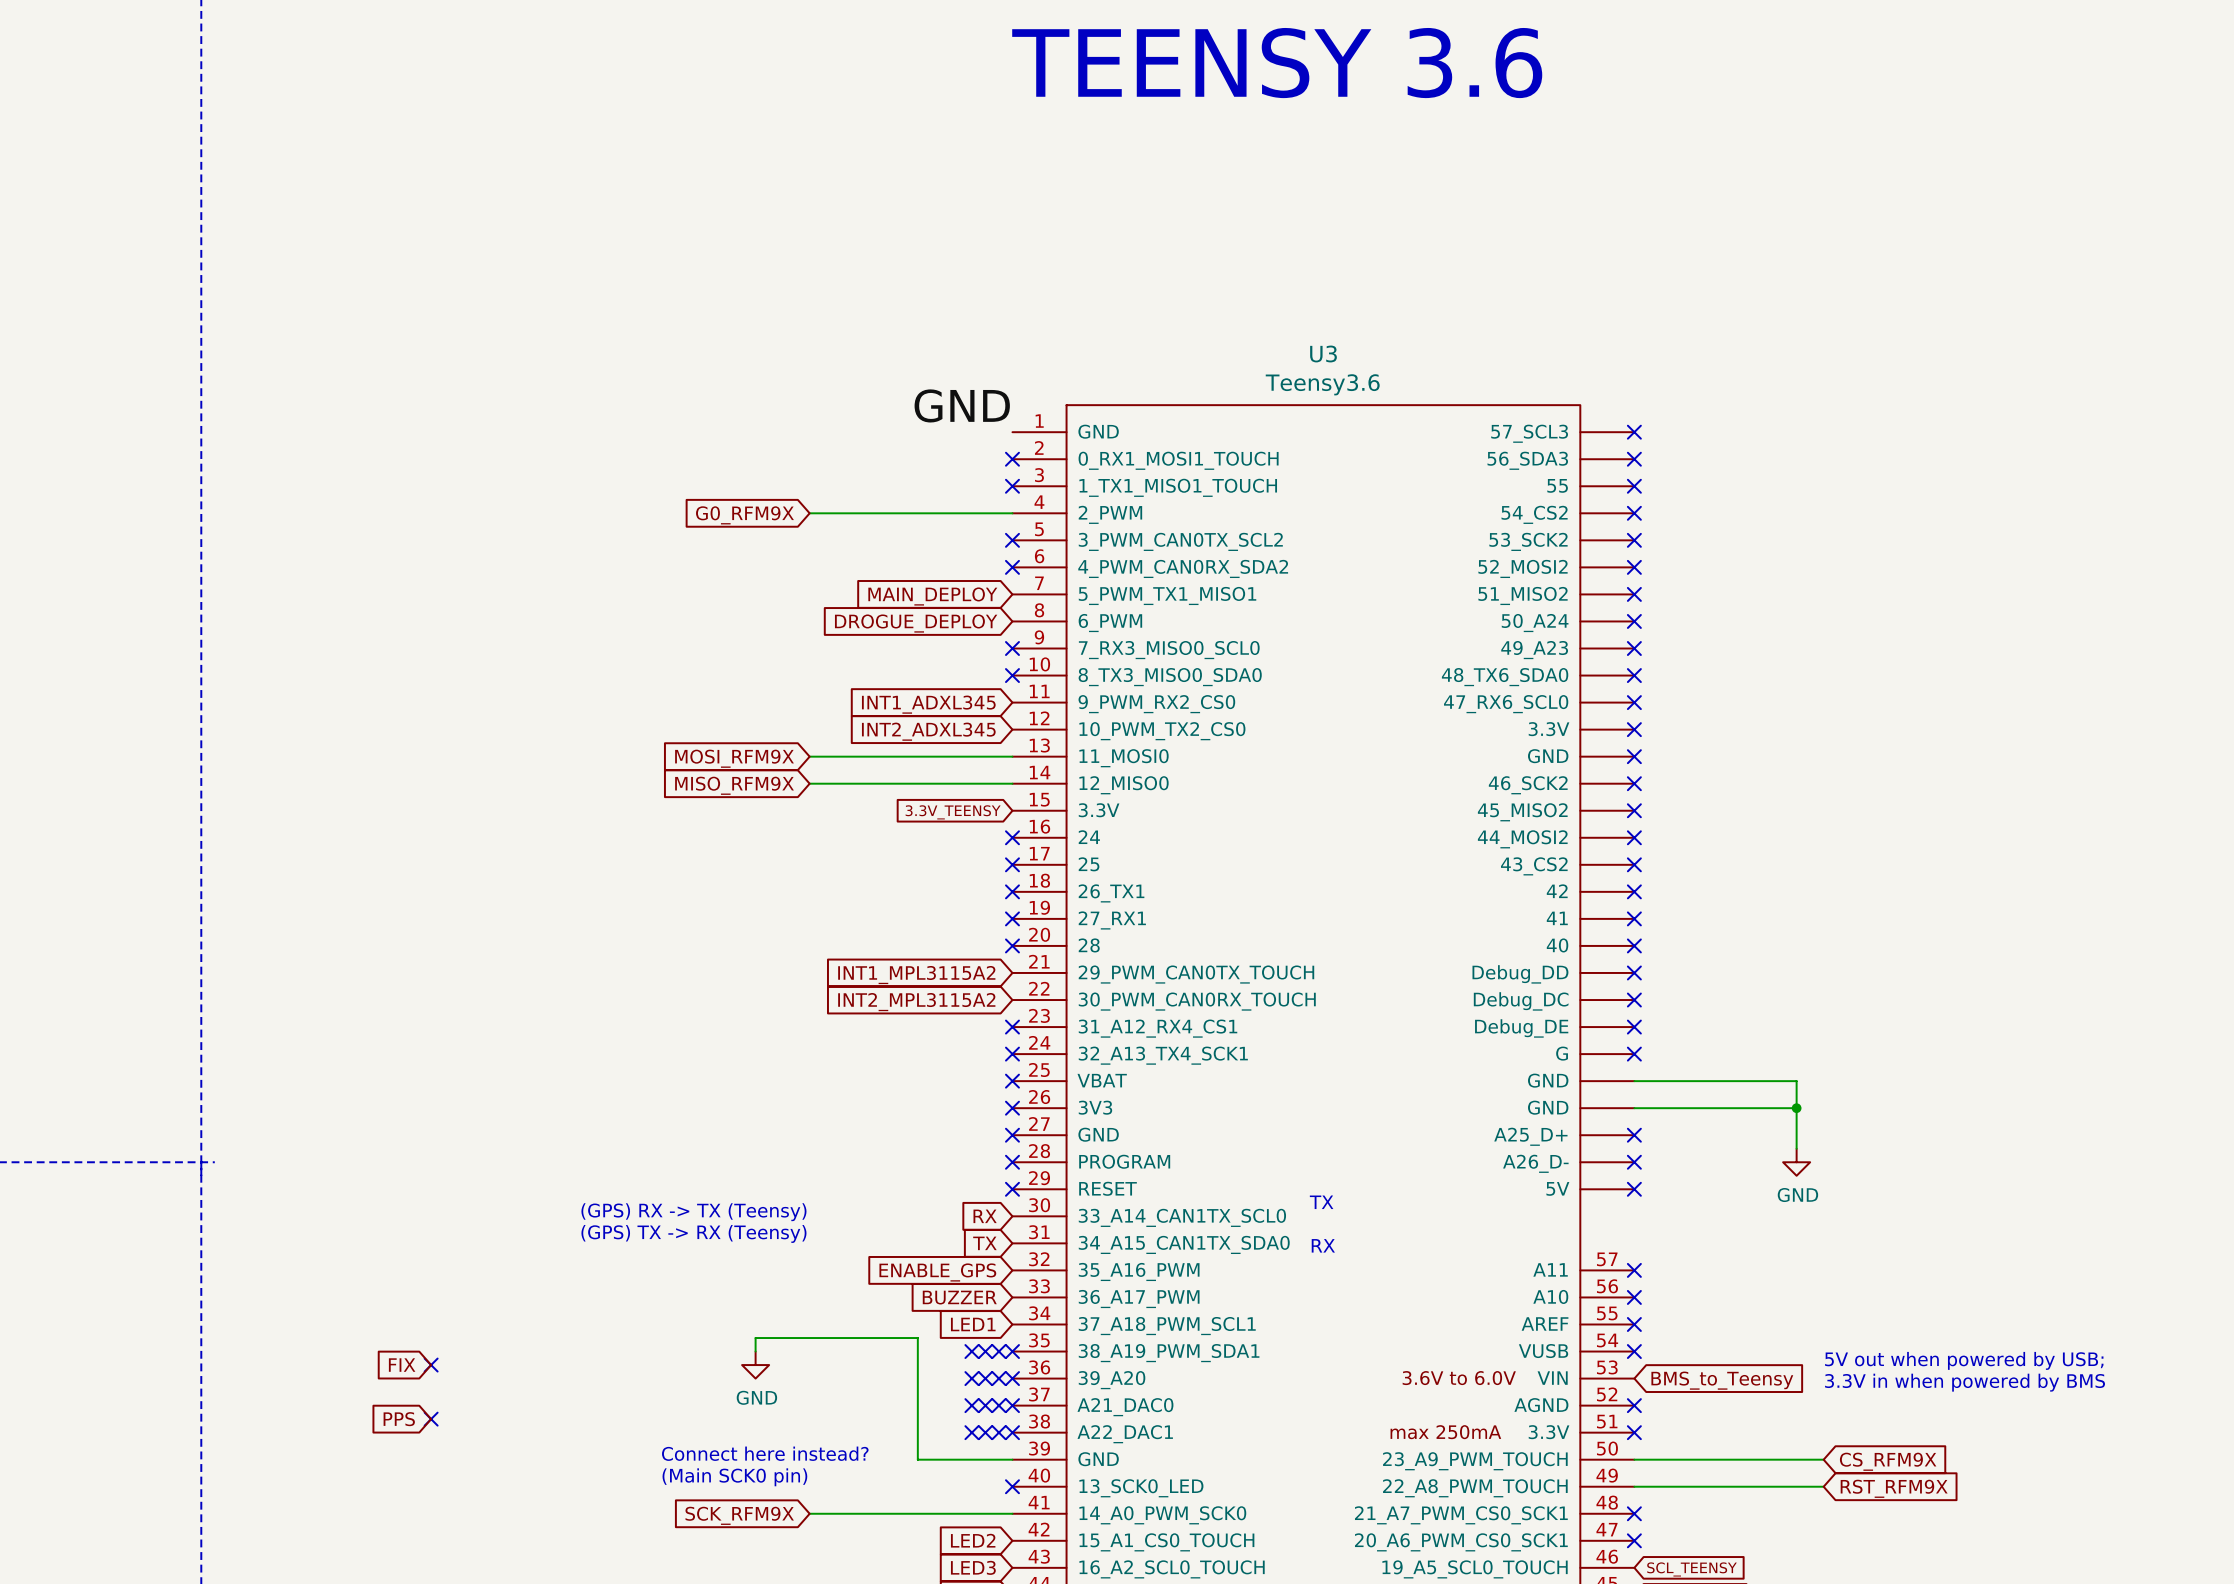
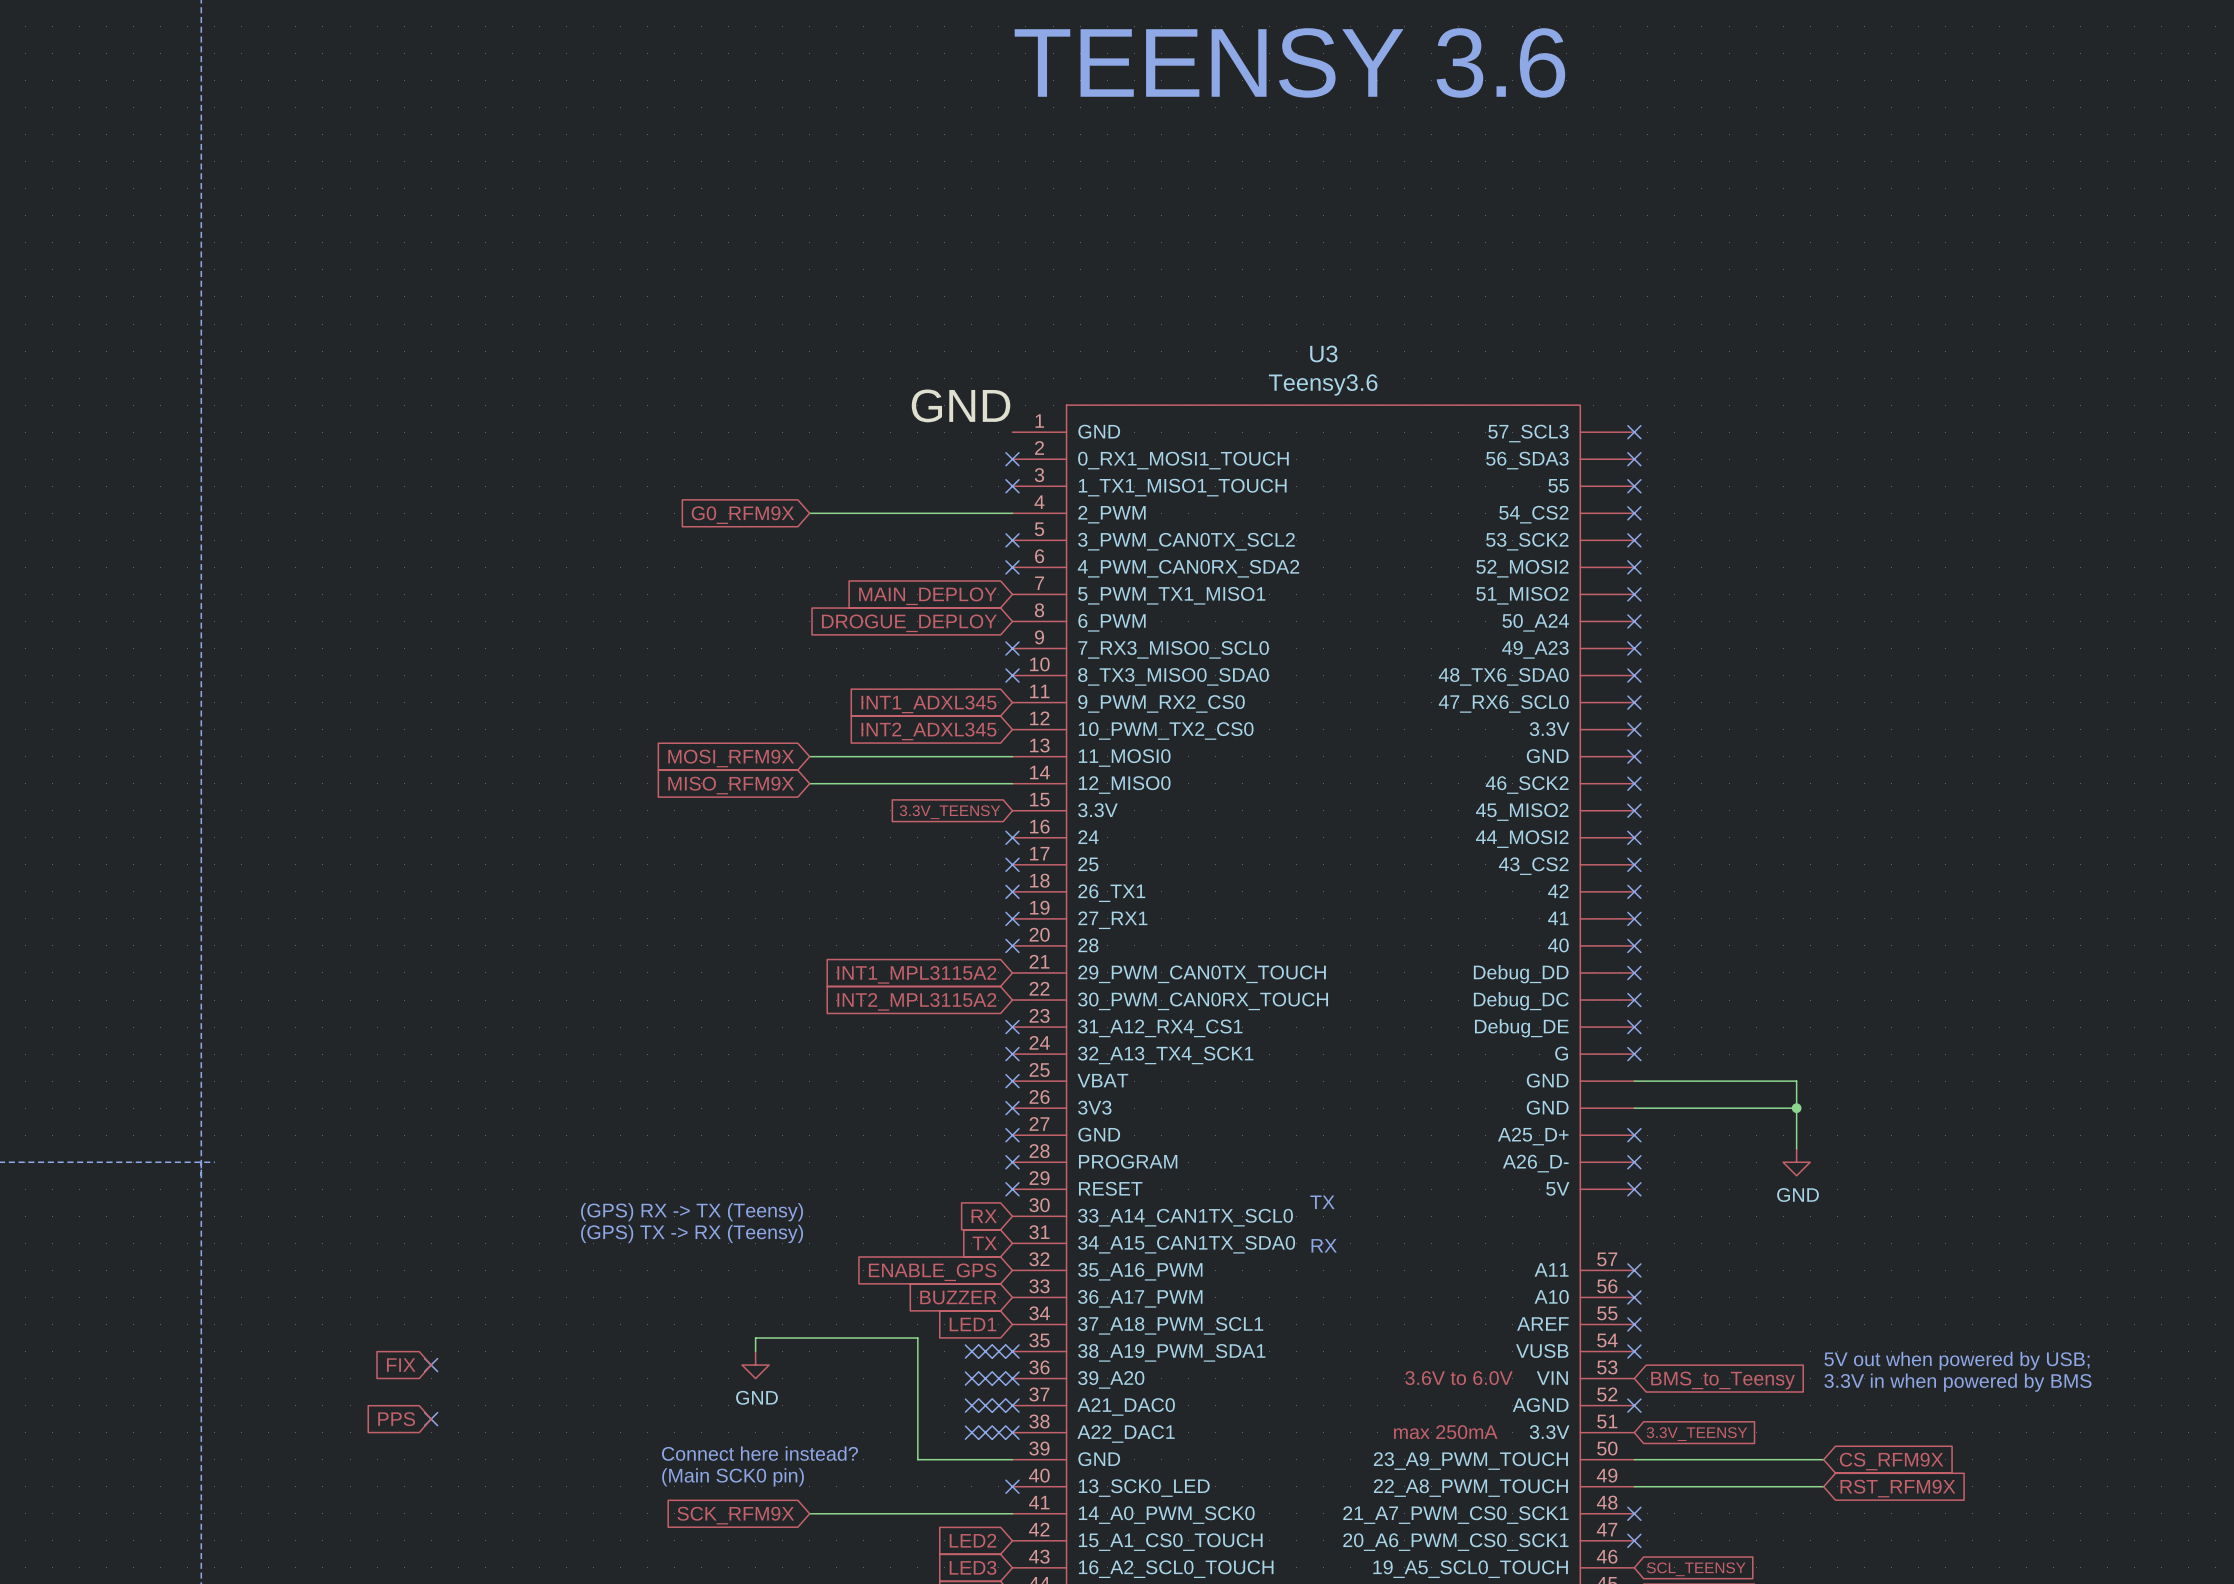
no-connect mark: (1634, 1432) -> none
global label: none -> 3.3V_TEENSY (1697, 1434)

